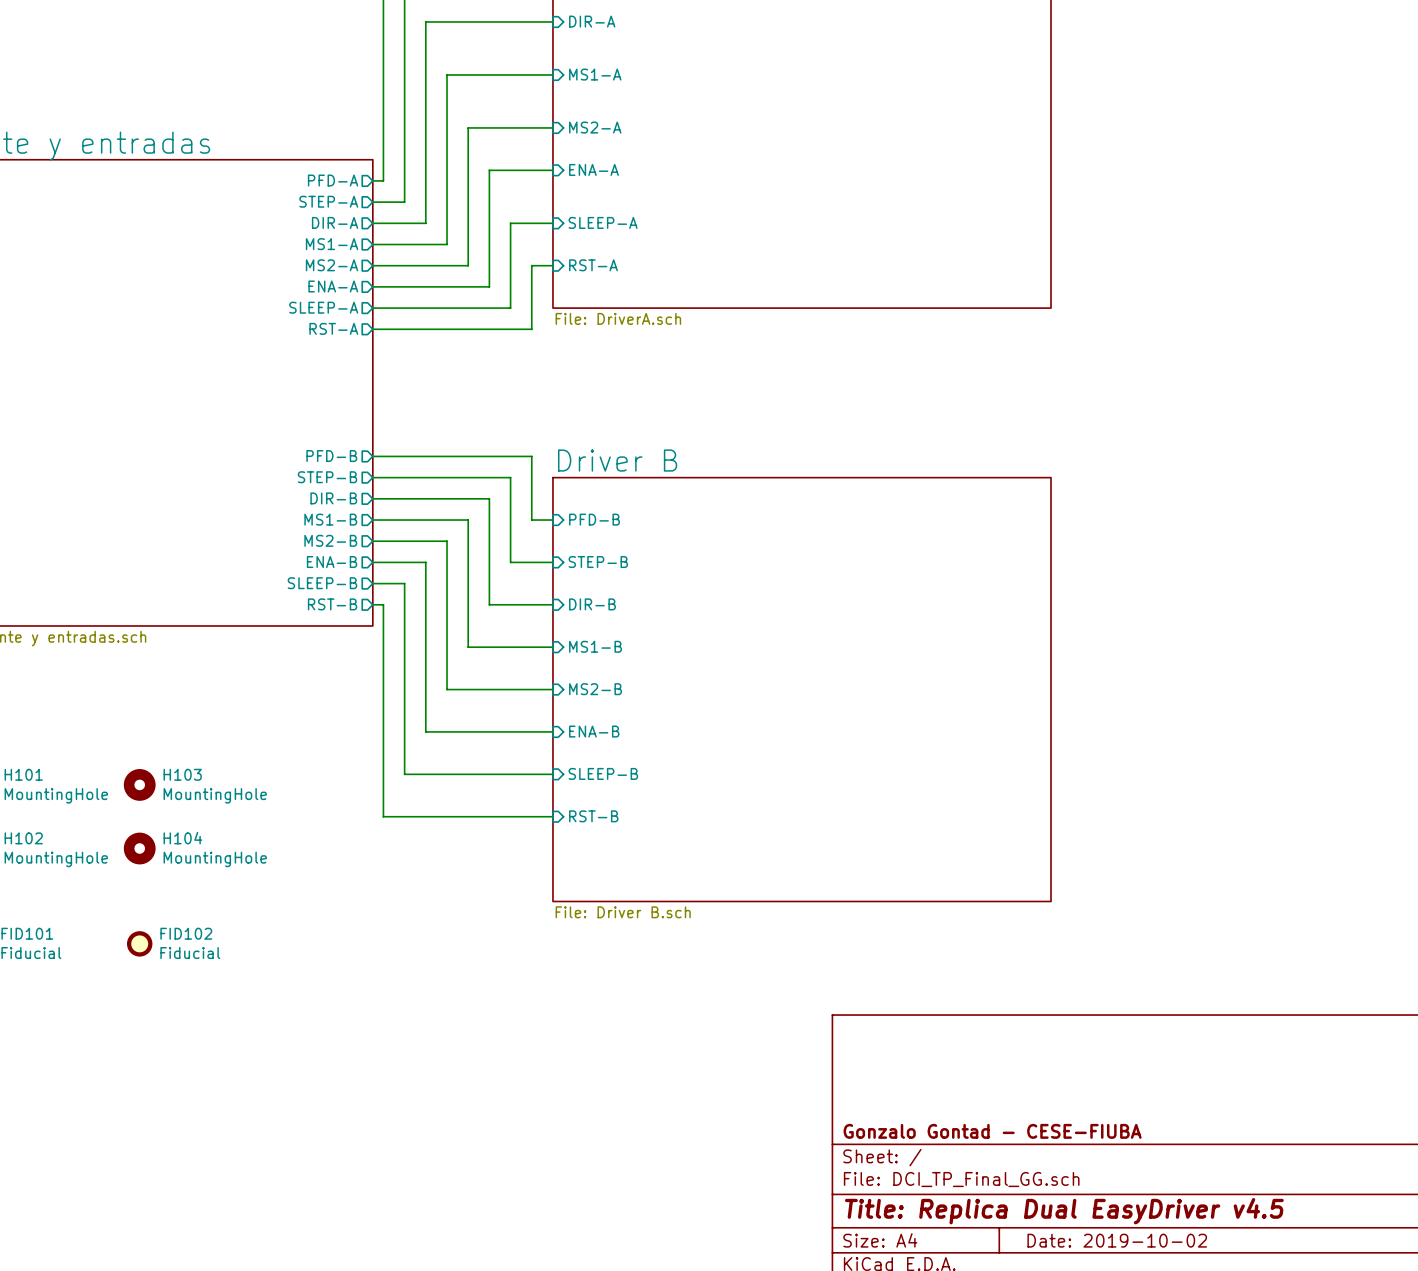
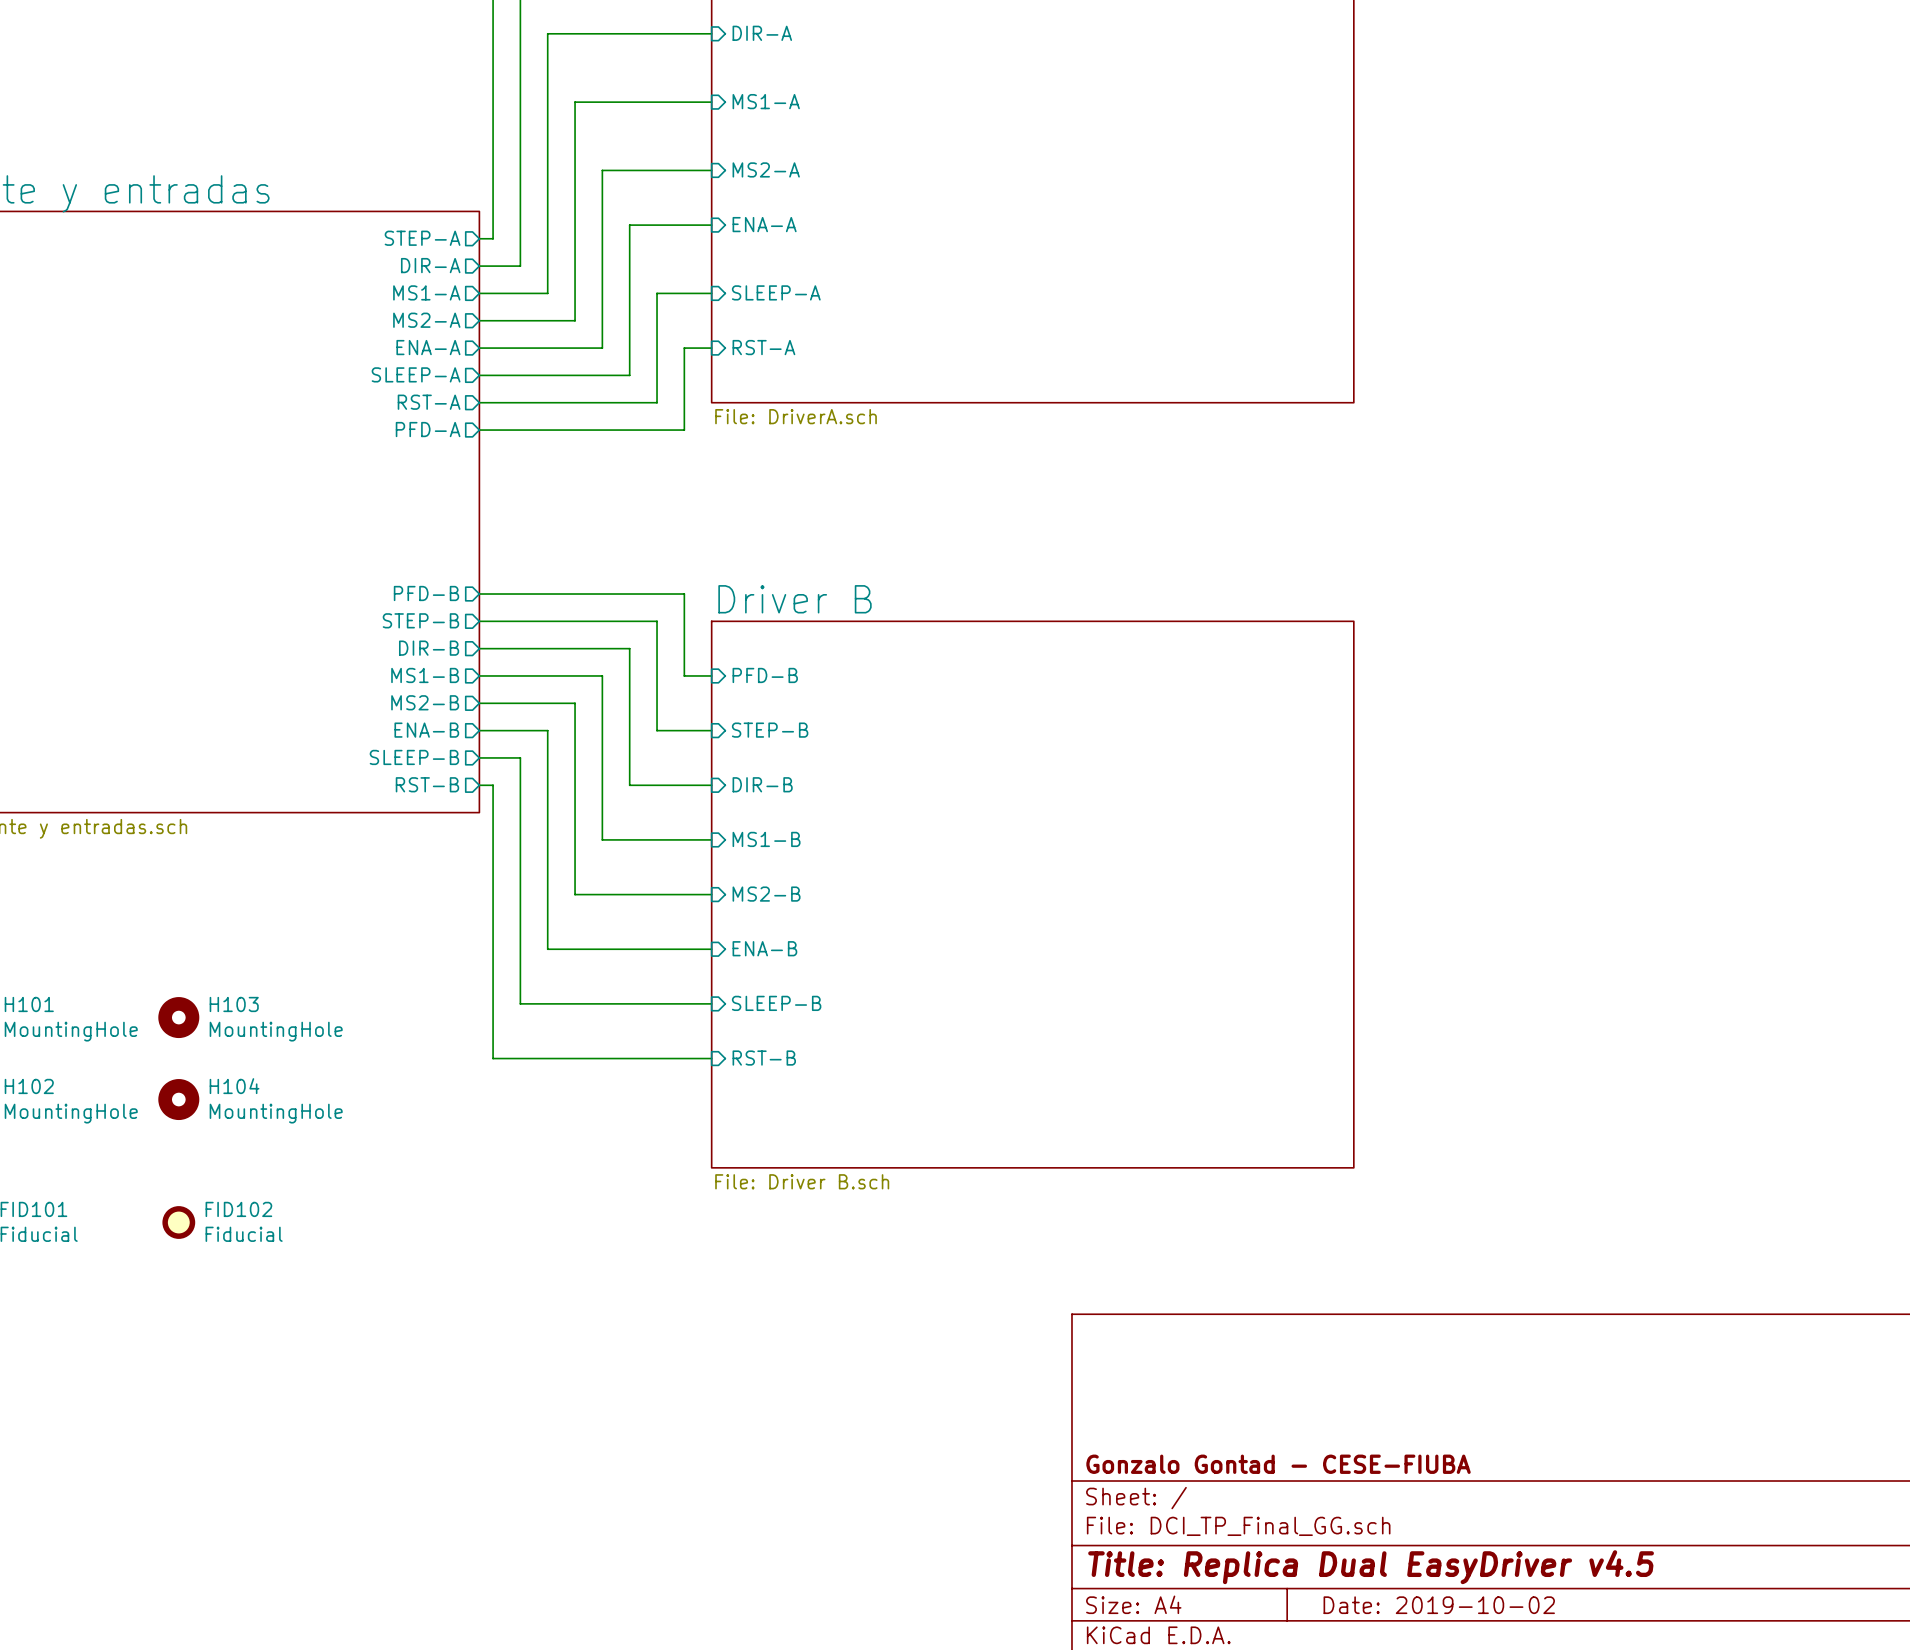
sheet pin: PFD-A (333, 180) -> STEP-A (422, 238)
sheet pin: STEP-A (328, 201) -> DIR-A (430, 265)
sheet pin: DIR-A (335, 222) -> MS1-A (426, 292)
sheet pin: MS1-A (332, 244) -> MS2-A (426, 320)
sheet pin: MS2-A (332, 265) -> ENA-A (428, 347)
sheet pin: ENA-A (333, 286) -> SLEEP-A (416, 374)
sheet pin: SLEEP-A (323, 307) -> RST-A (429, 402)
sheet pin: RST-A (333, 328) -> PFD-A (428, 429)

